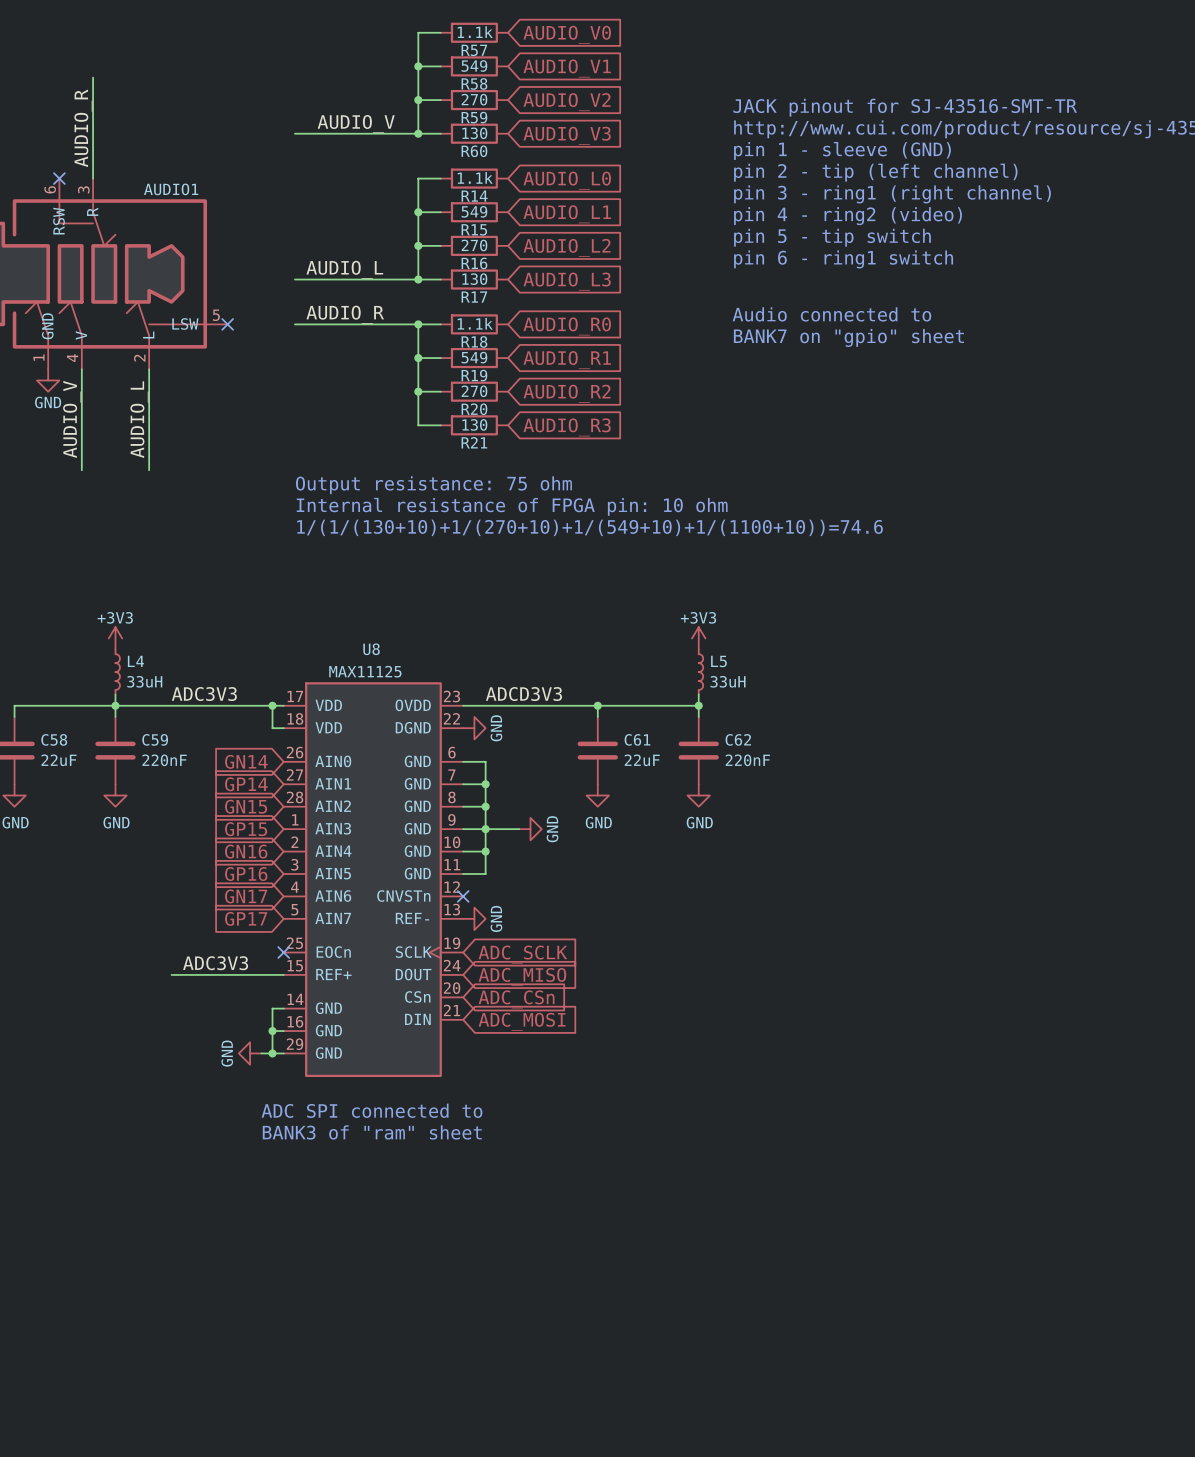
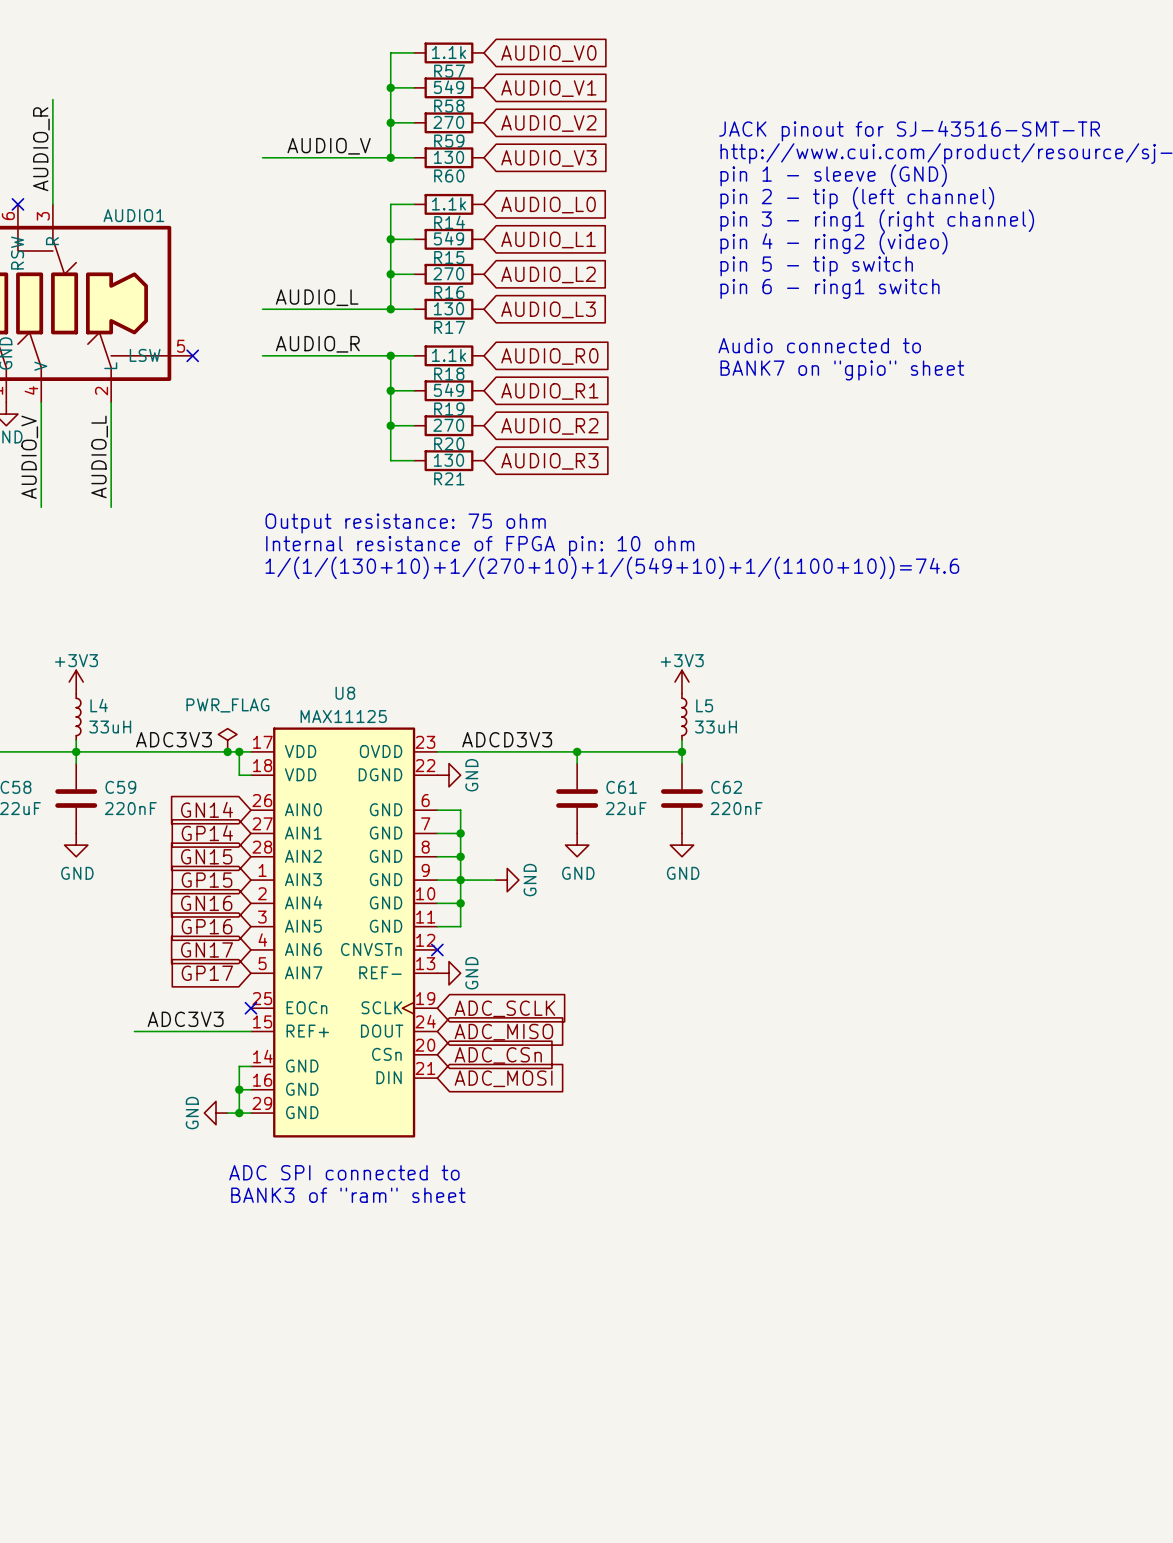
power symbol: none -> PWR_FLAG (227, 740)
junction: none -> (227, 751)

